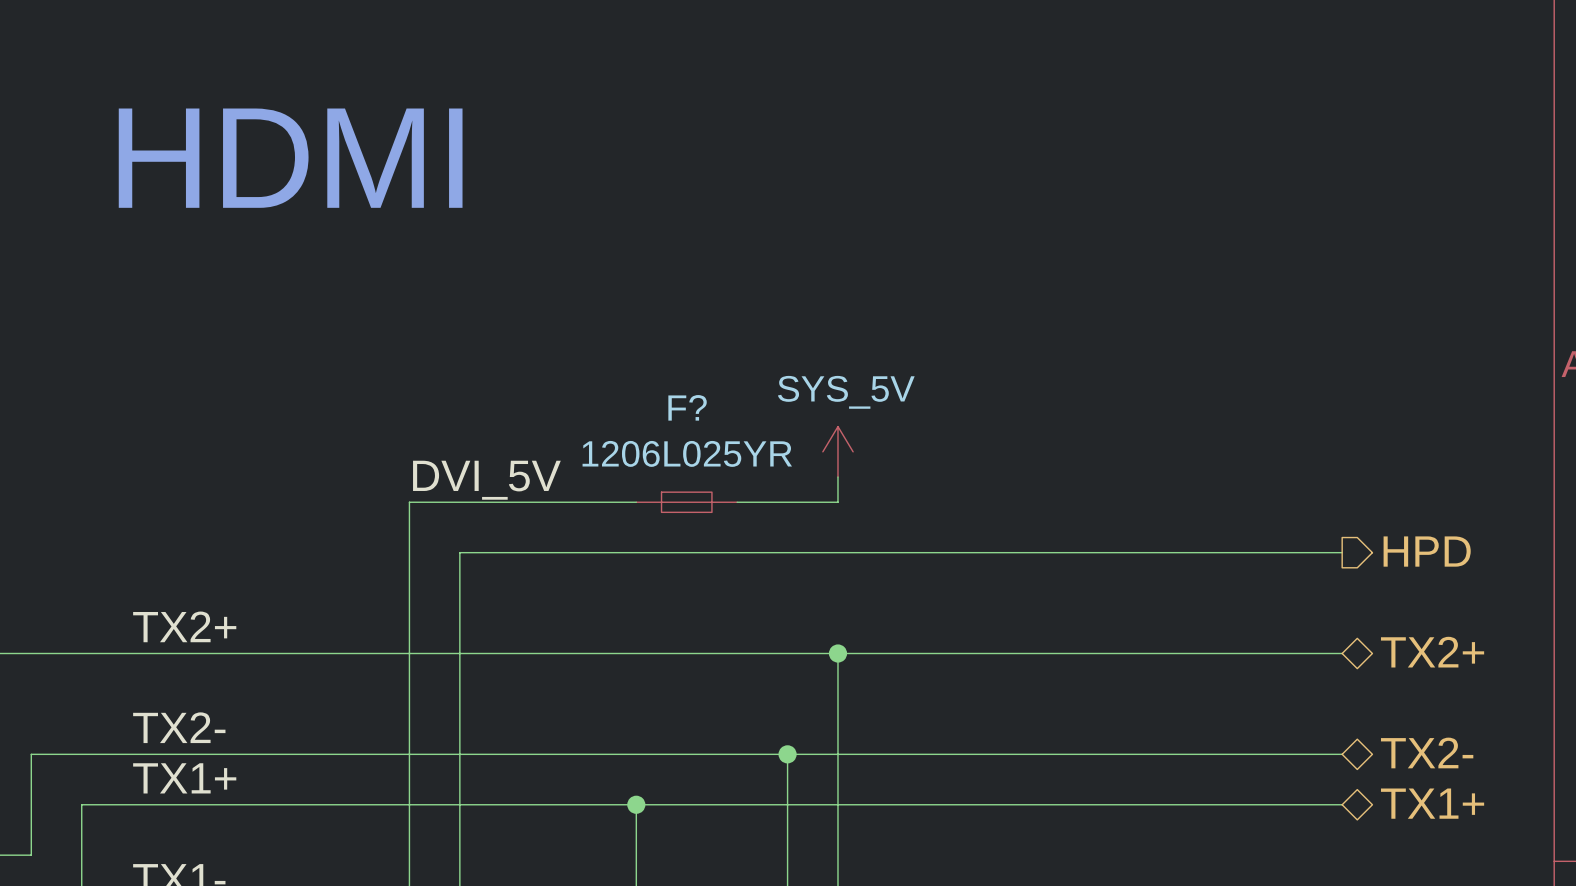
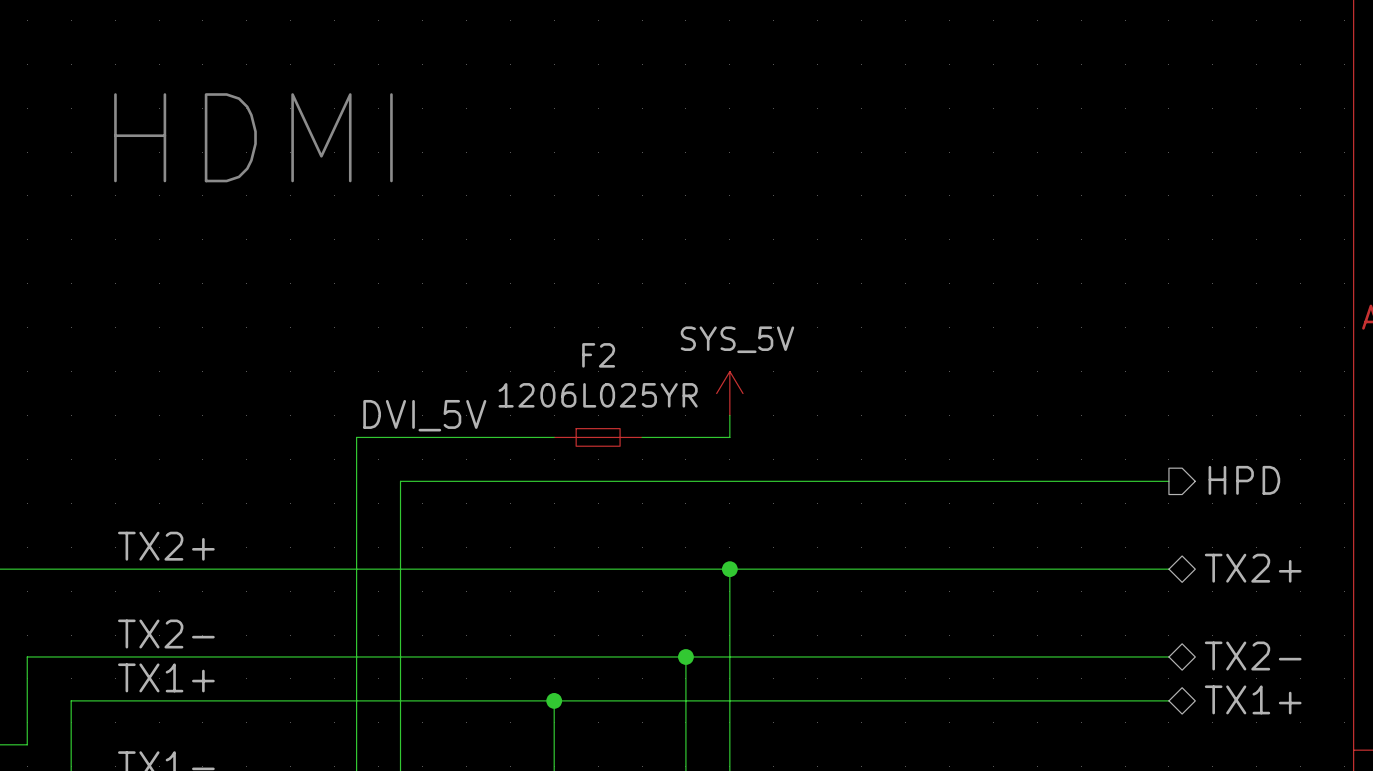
F? name: F? (687, 407) -> F2 (598, 355)

